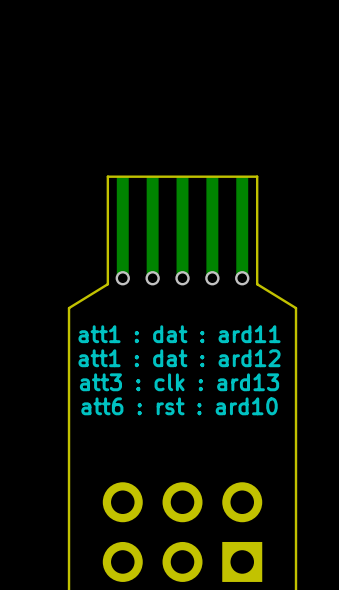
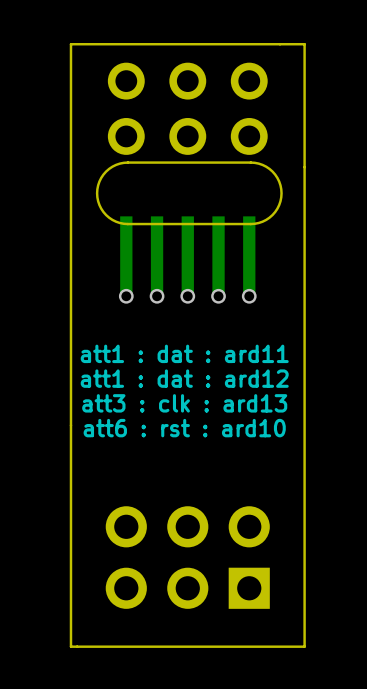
part: none -> (126, 81)
part: none -> (187, 81)
part: none -> (249, 81)
part: none -> (126, 136)
part: none -> (187, 136)
part: none -> (249, 136)
board edge: none -> (250, 162) (119, 163) (109, 168) (101, 177) (97, 189) (98, 201) (101, 208) (109, 217) (123, 223) (258, 222) (269, 217) (277, 208) (281, 197) (281, 189) (277, 177) (269, 168) (262, 164) (250, 162)
part footprint: [116, 176, 249, 279] -> [120, 216, 256, 297]
board edge: (296, 308) (257, 284) (257, 176) (107, 176) (107, 284) (69, 308) -> (304, 327) (304, 44) (70, 44) (70, 327)

